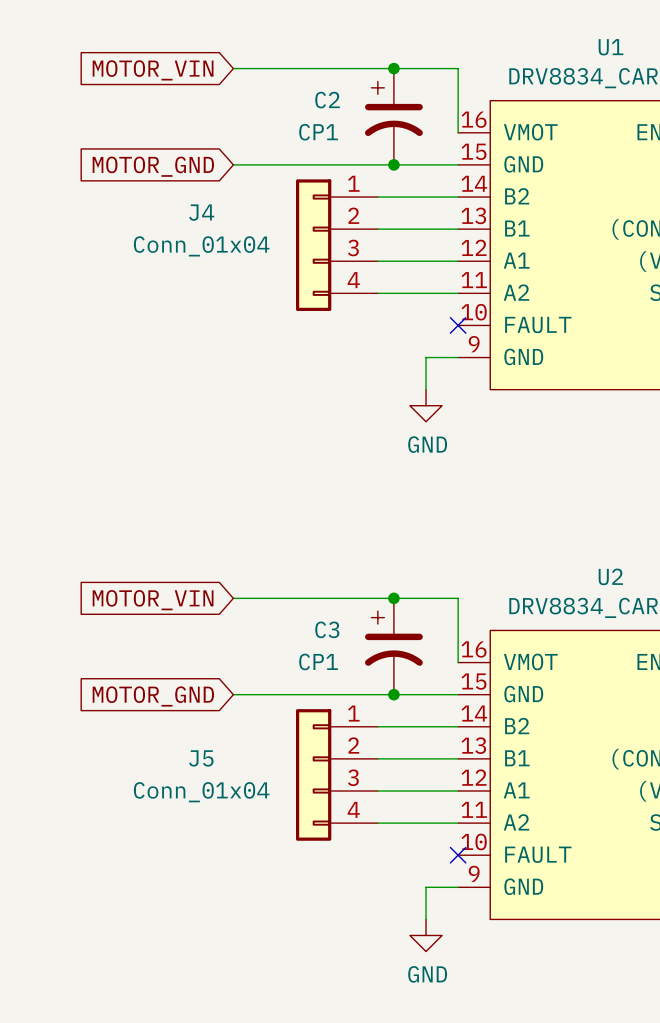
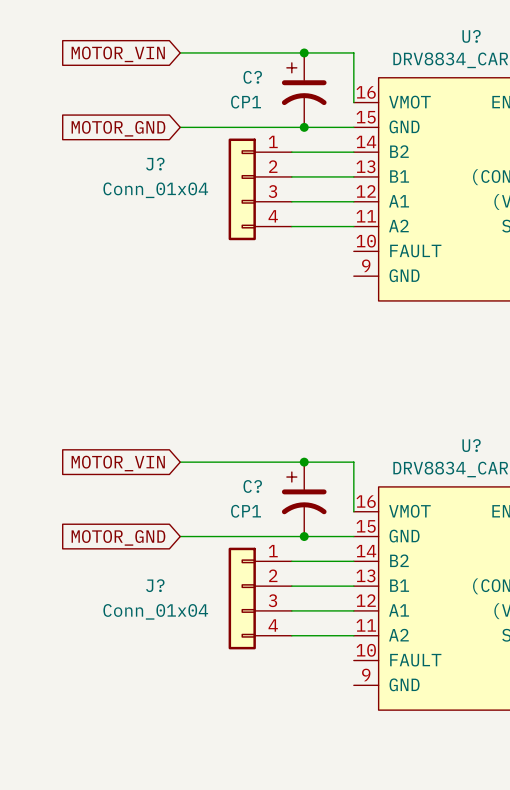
U1 name: U1 (611, 47) -> U? (471, 36)
C2 name: C2 (327, 100) -> C? (252, 77)
J4 name: J4 (201, 212) -> J? (155, 164)
no-connect mark: (458, 325) -> none
wire: (458, 357) (426, 357) (426, 389) -> none
power symbol: GND (426, 405) -> none
U2 name: U2 (610, 576) -> U? (471, 445)
C3 name: C3 (327, 629) -> C? (252, 486)
J5 name: J5 (201, 758) -> J? (155, 585)
no-connect mark: (458, 855) -> none
wire: (458, 887) (426, 887) (426, 919) -> none
power symbol: GND (426, 935) -> none

